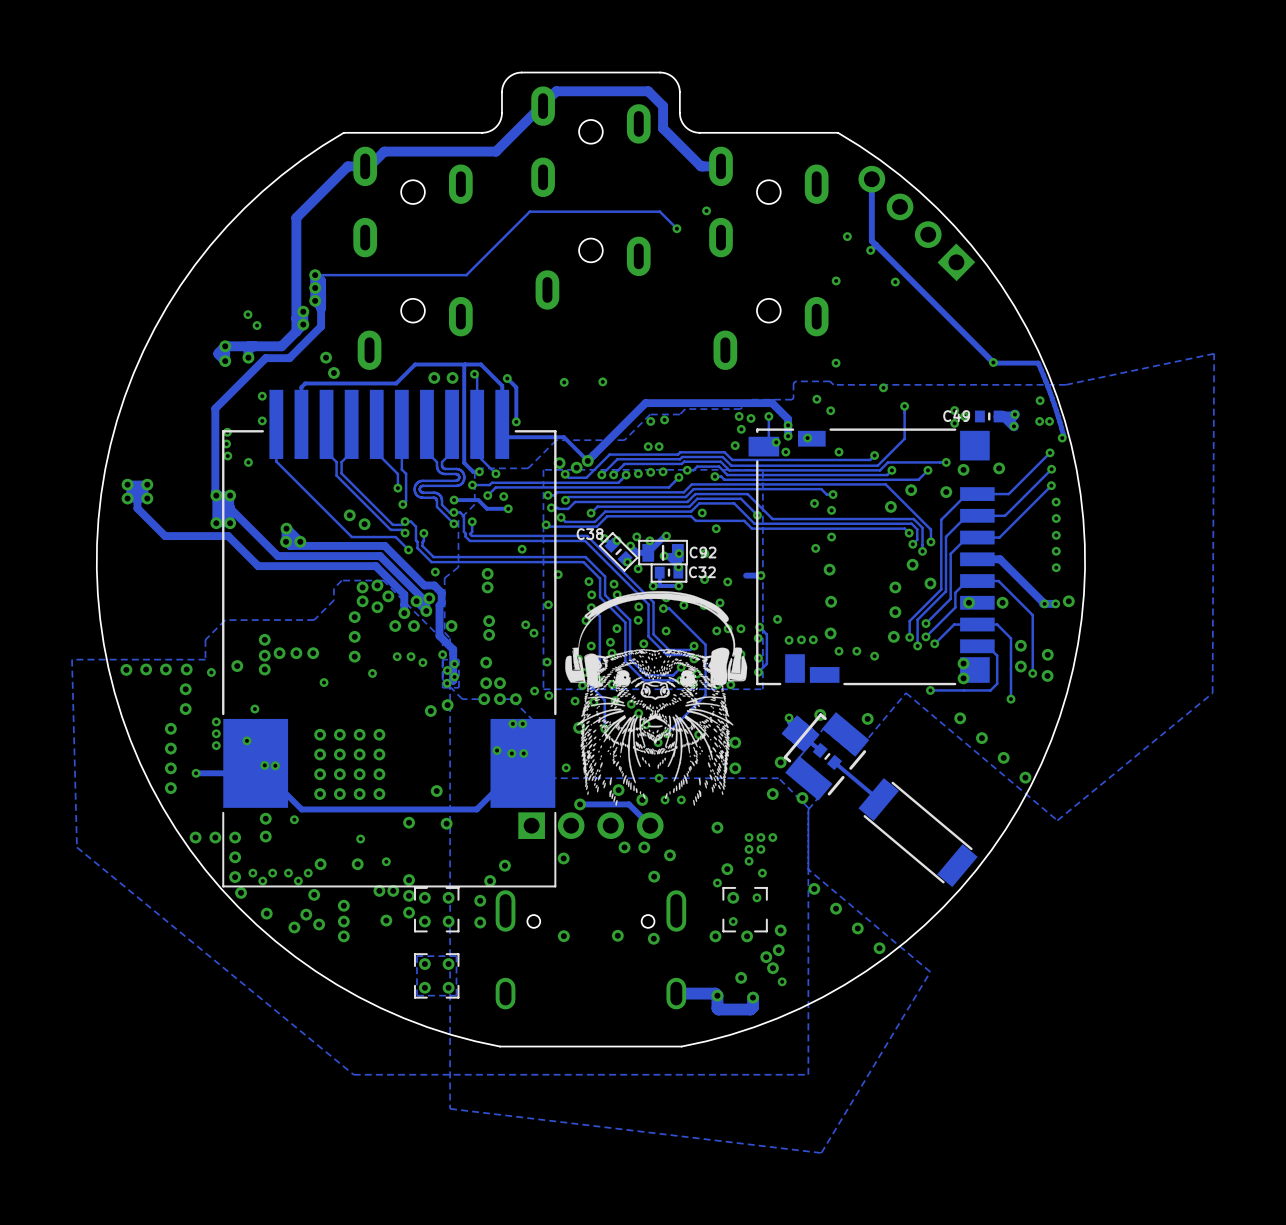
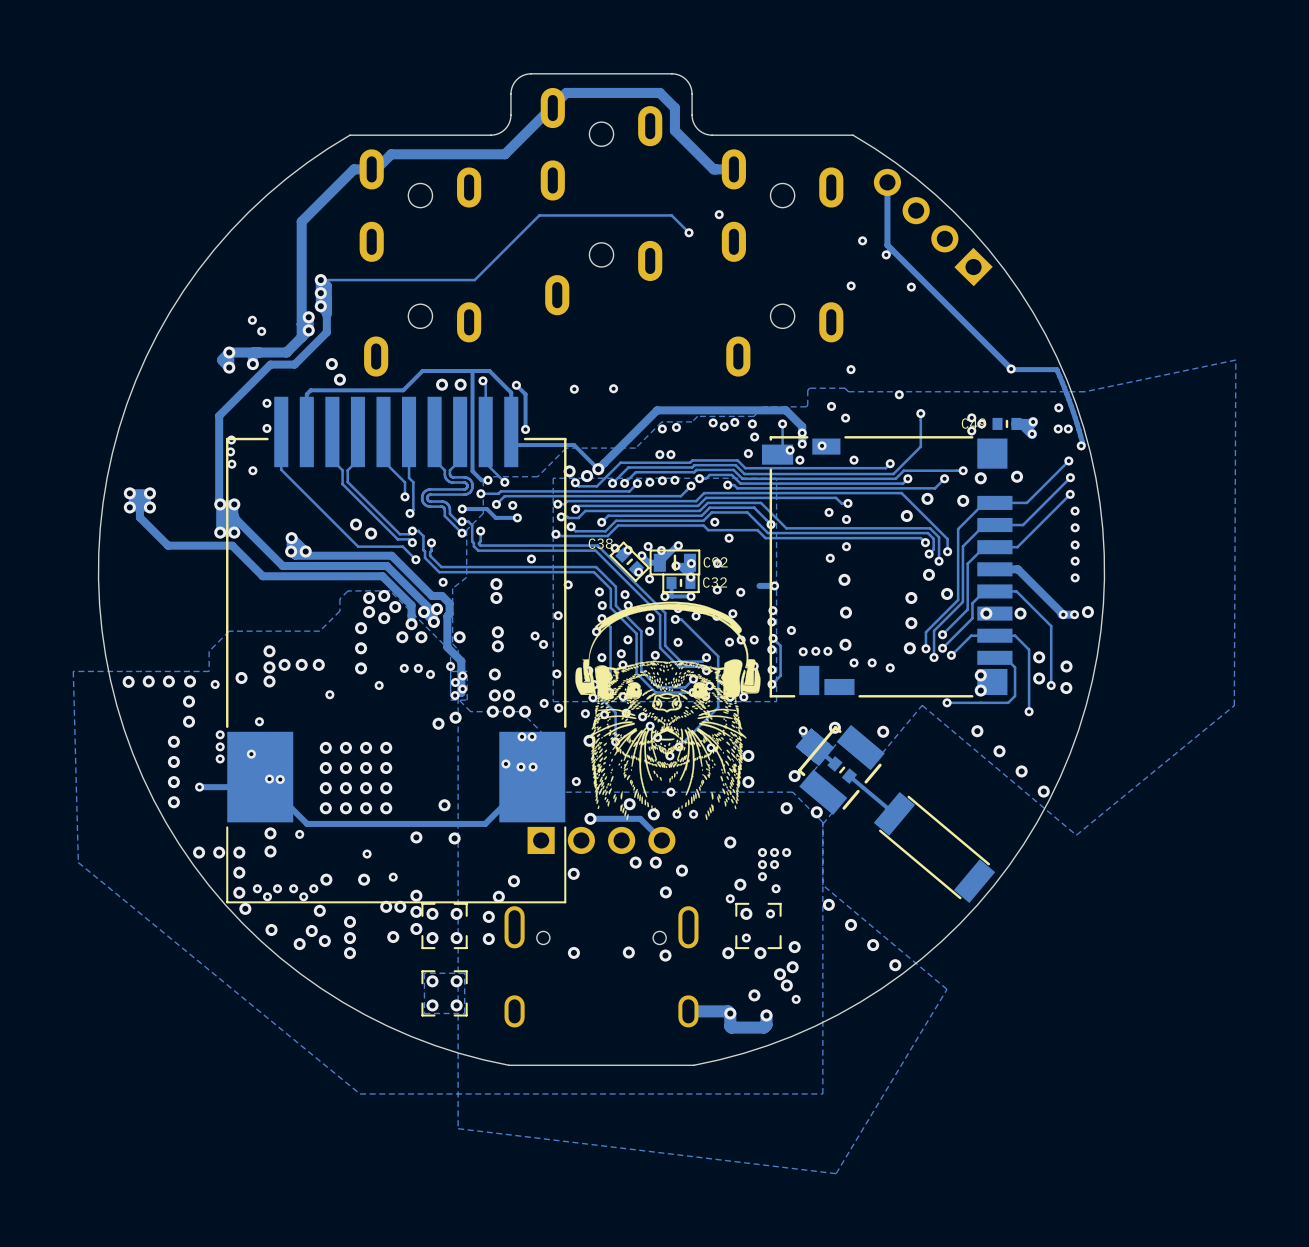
via: none -> (734, 422)
via: none -> (713, 422)
via: (751, 418) -> none
via: none -> (724, 426)
via: none -> (772, 610)
via: none -> (771, 621)

